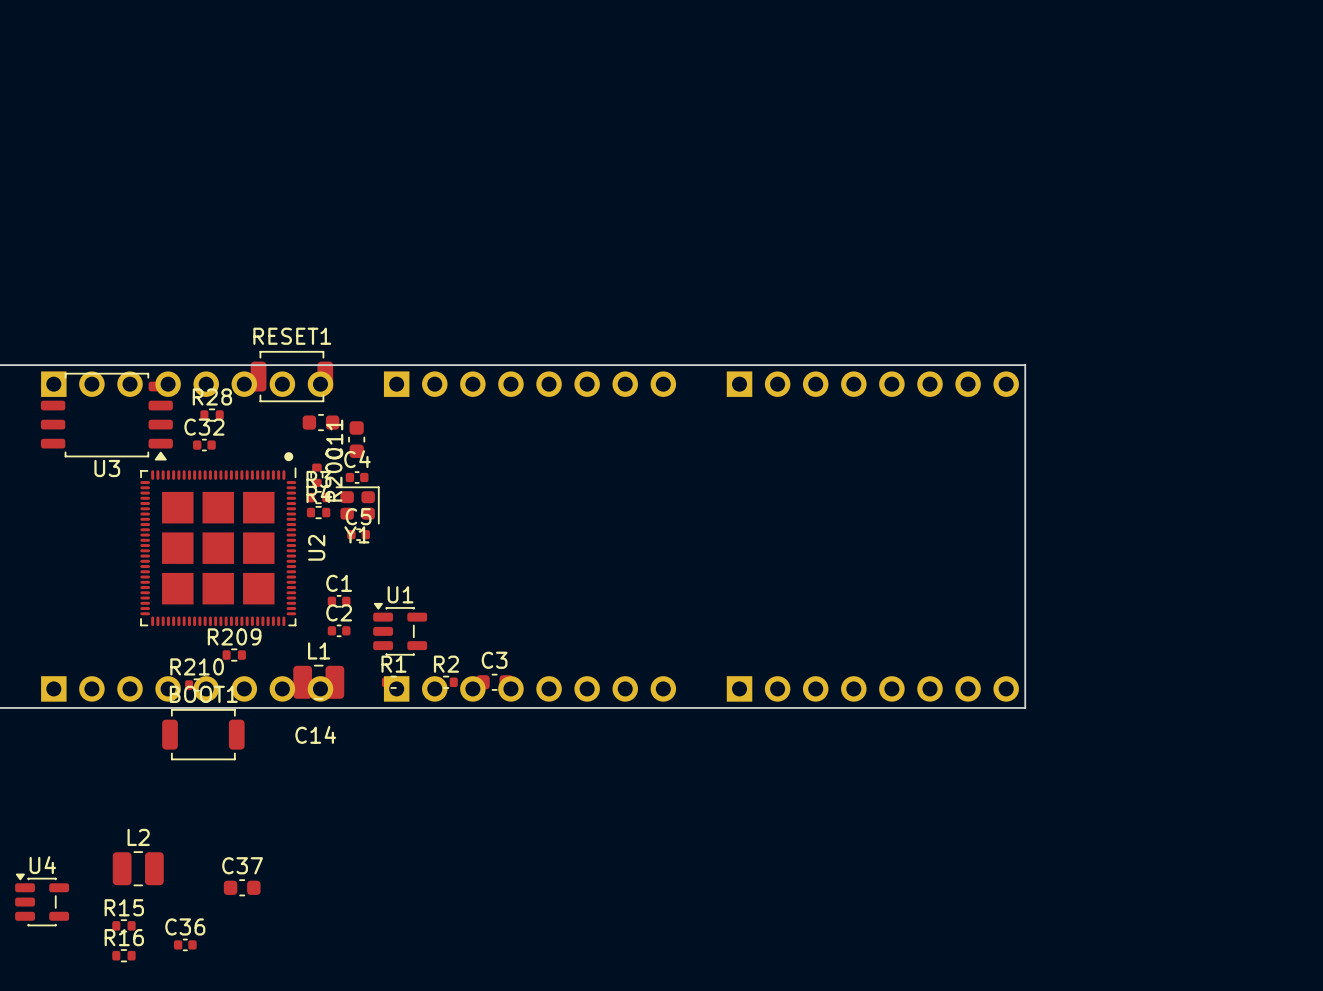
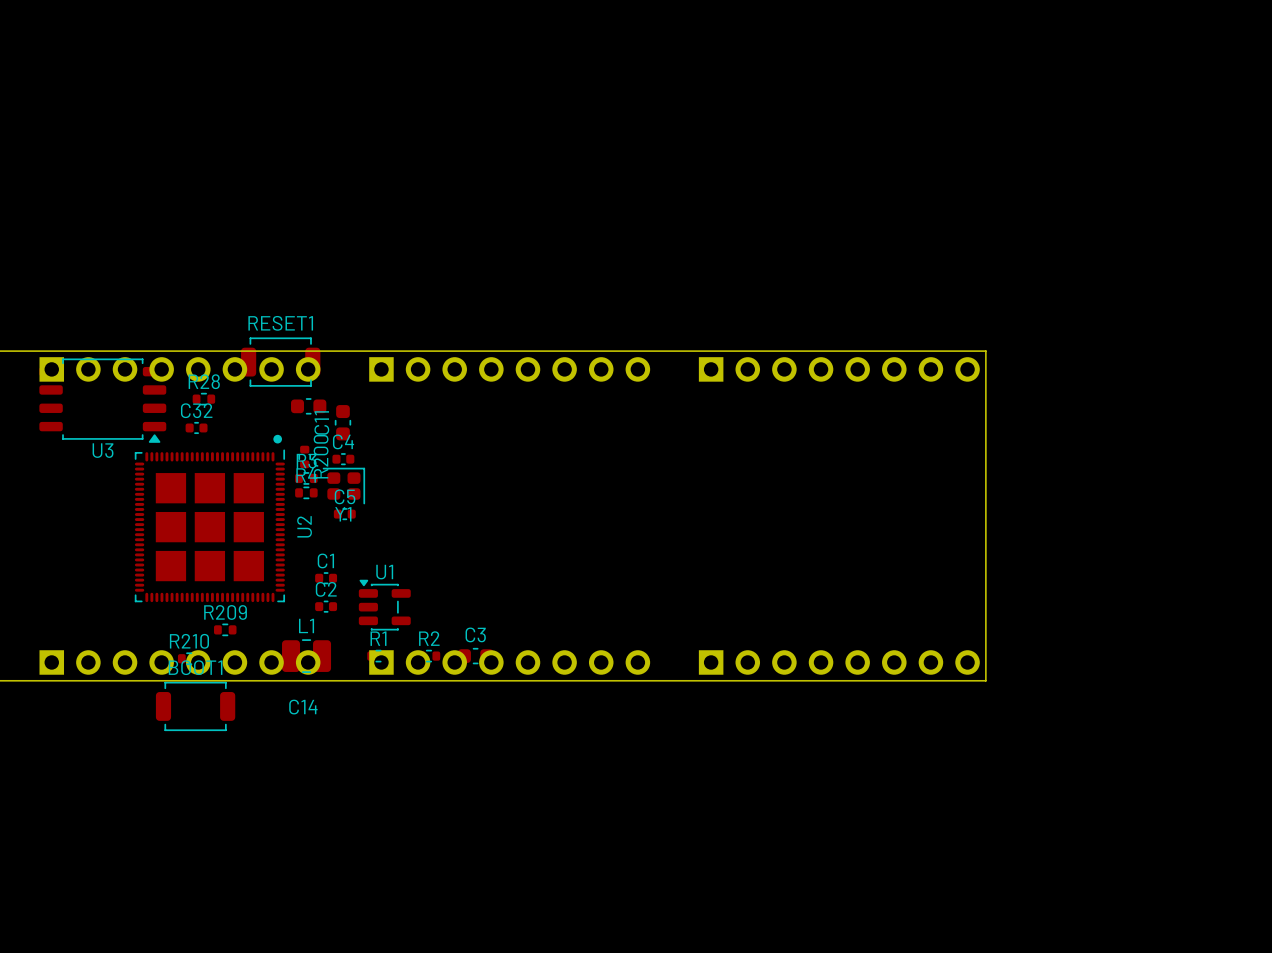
L2: (138, 868) -> none
C37: (242, 887) -> none
U4: (42, 899) -> none
R15: (123, 925) -> none
C36: (185, 944) -> none
R16: (123, 955) -> none

